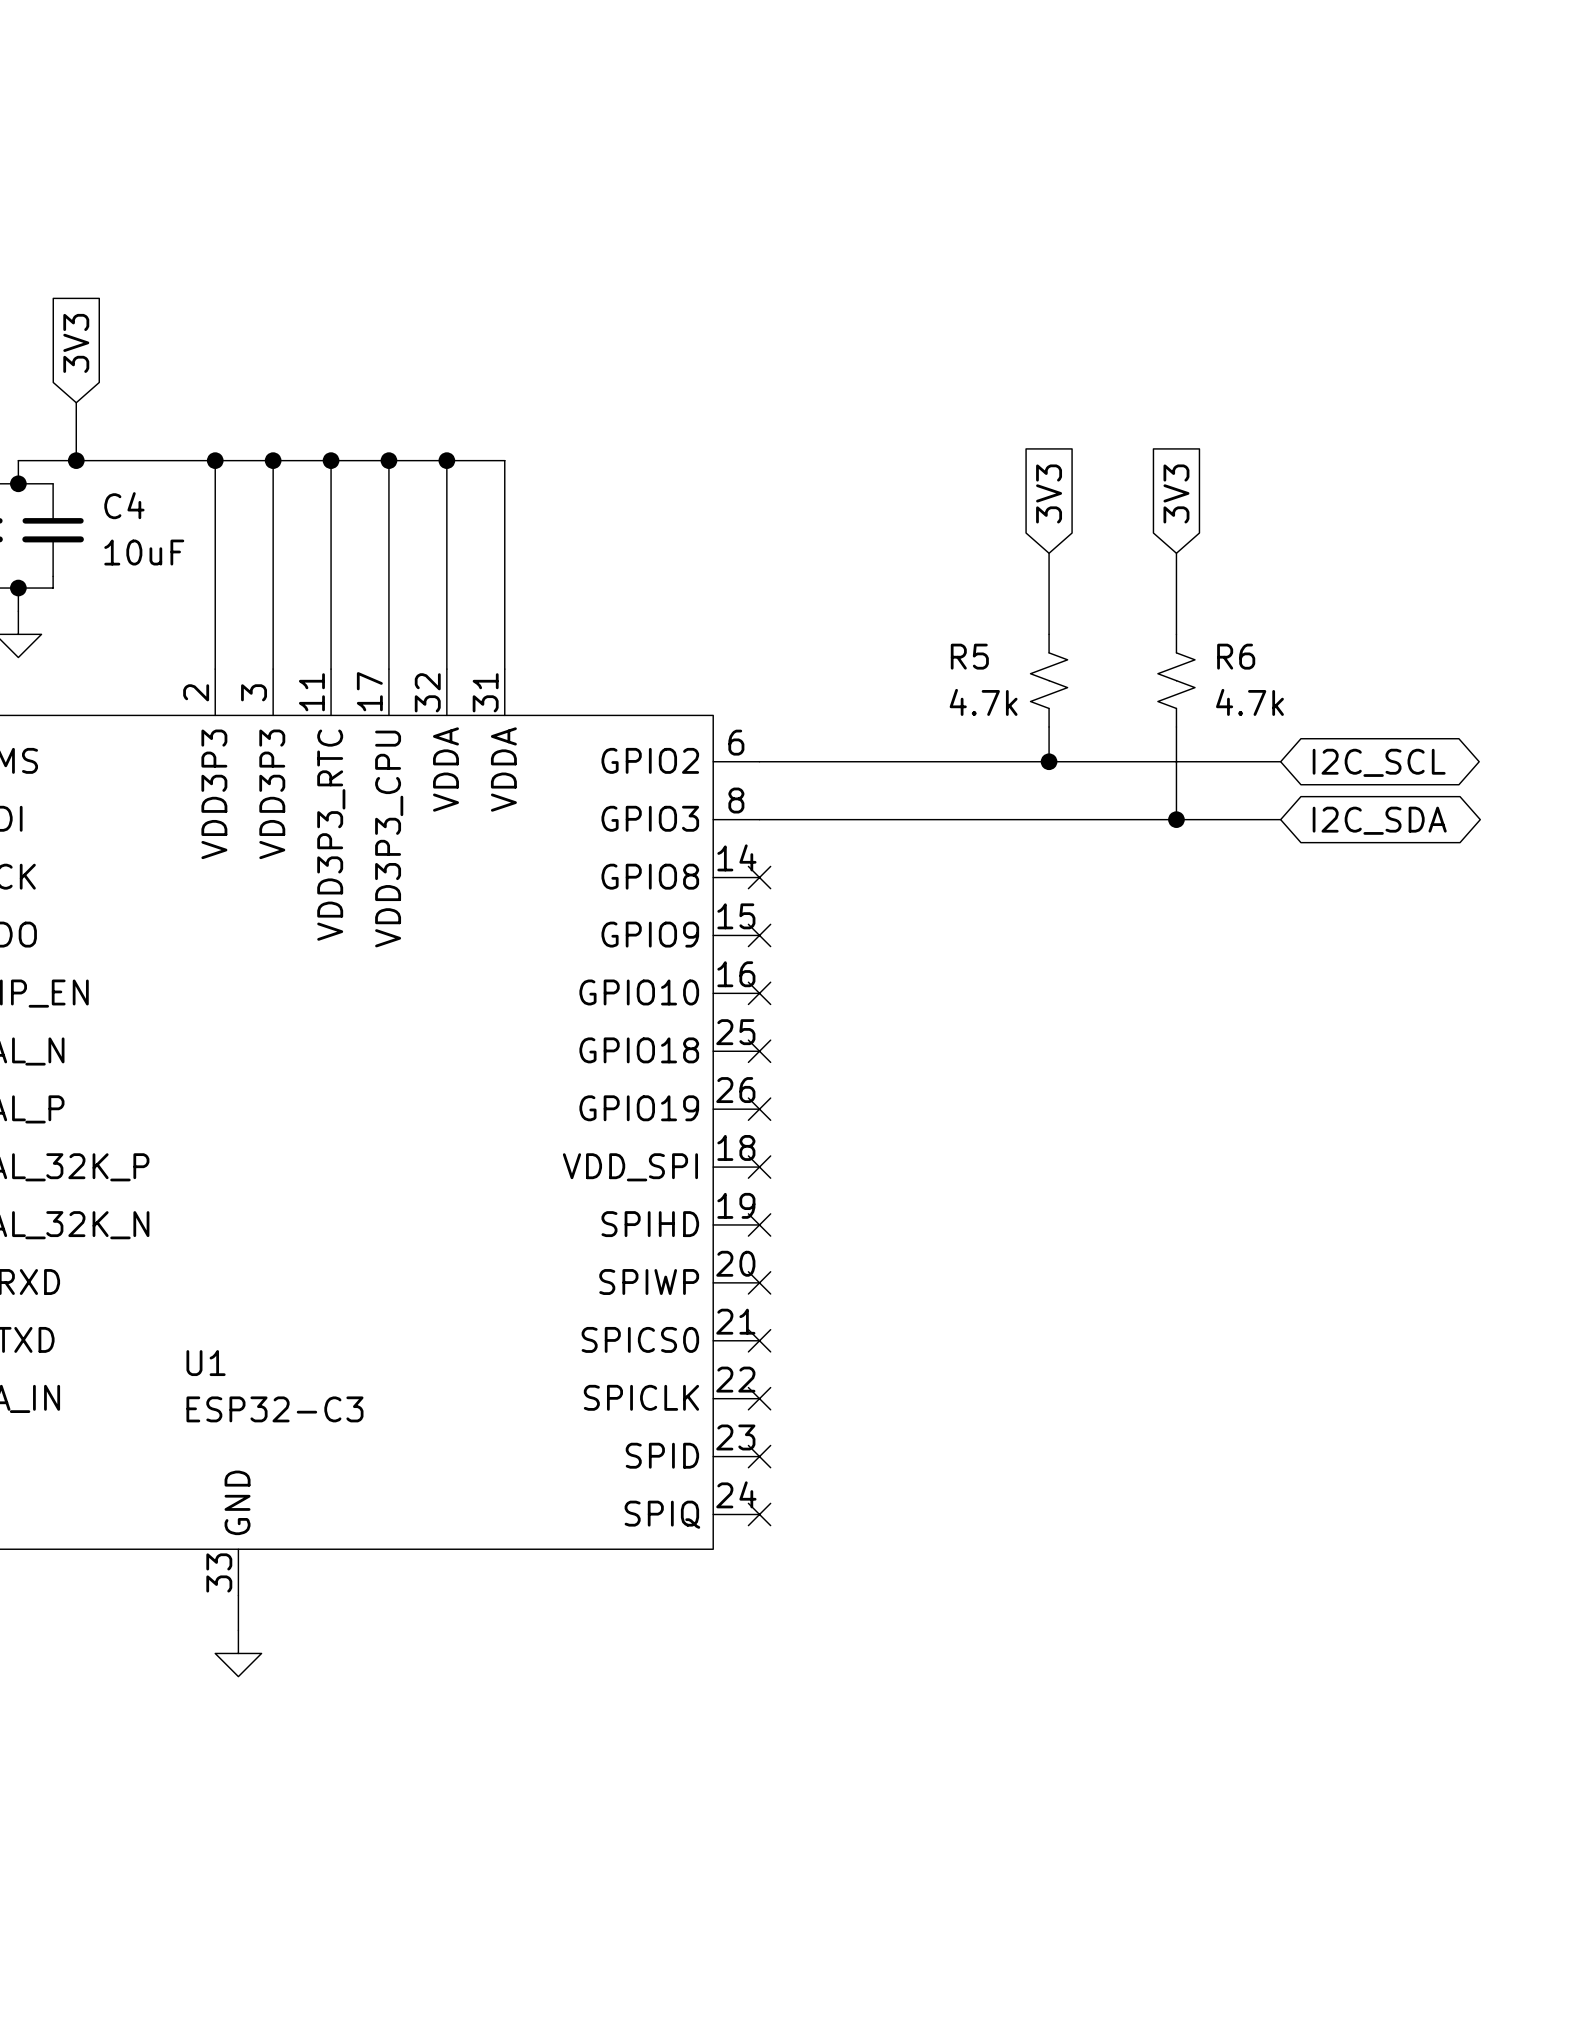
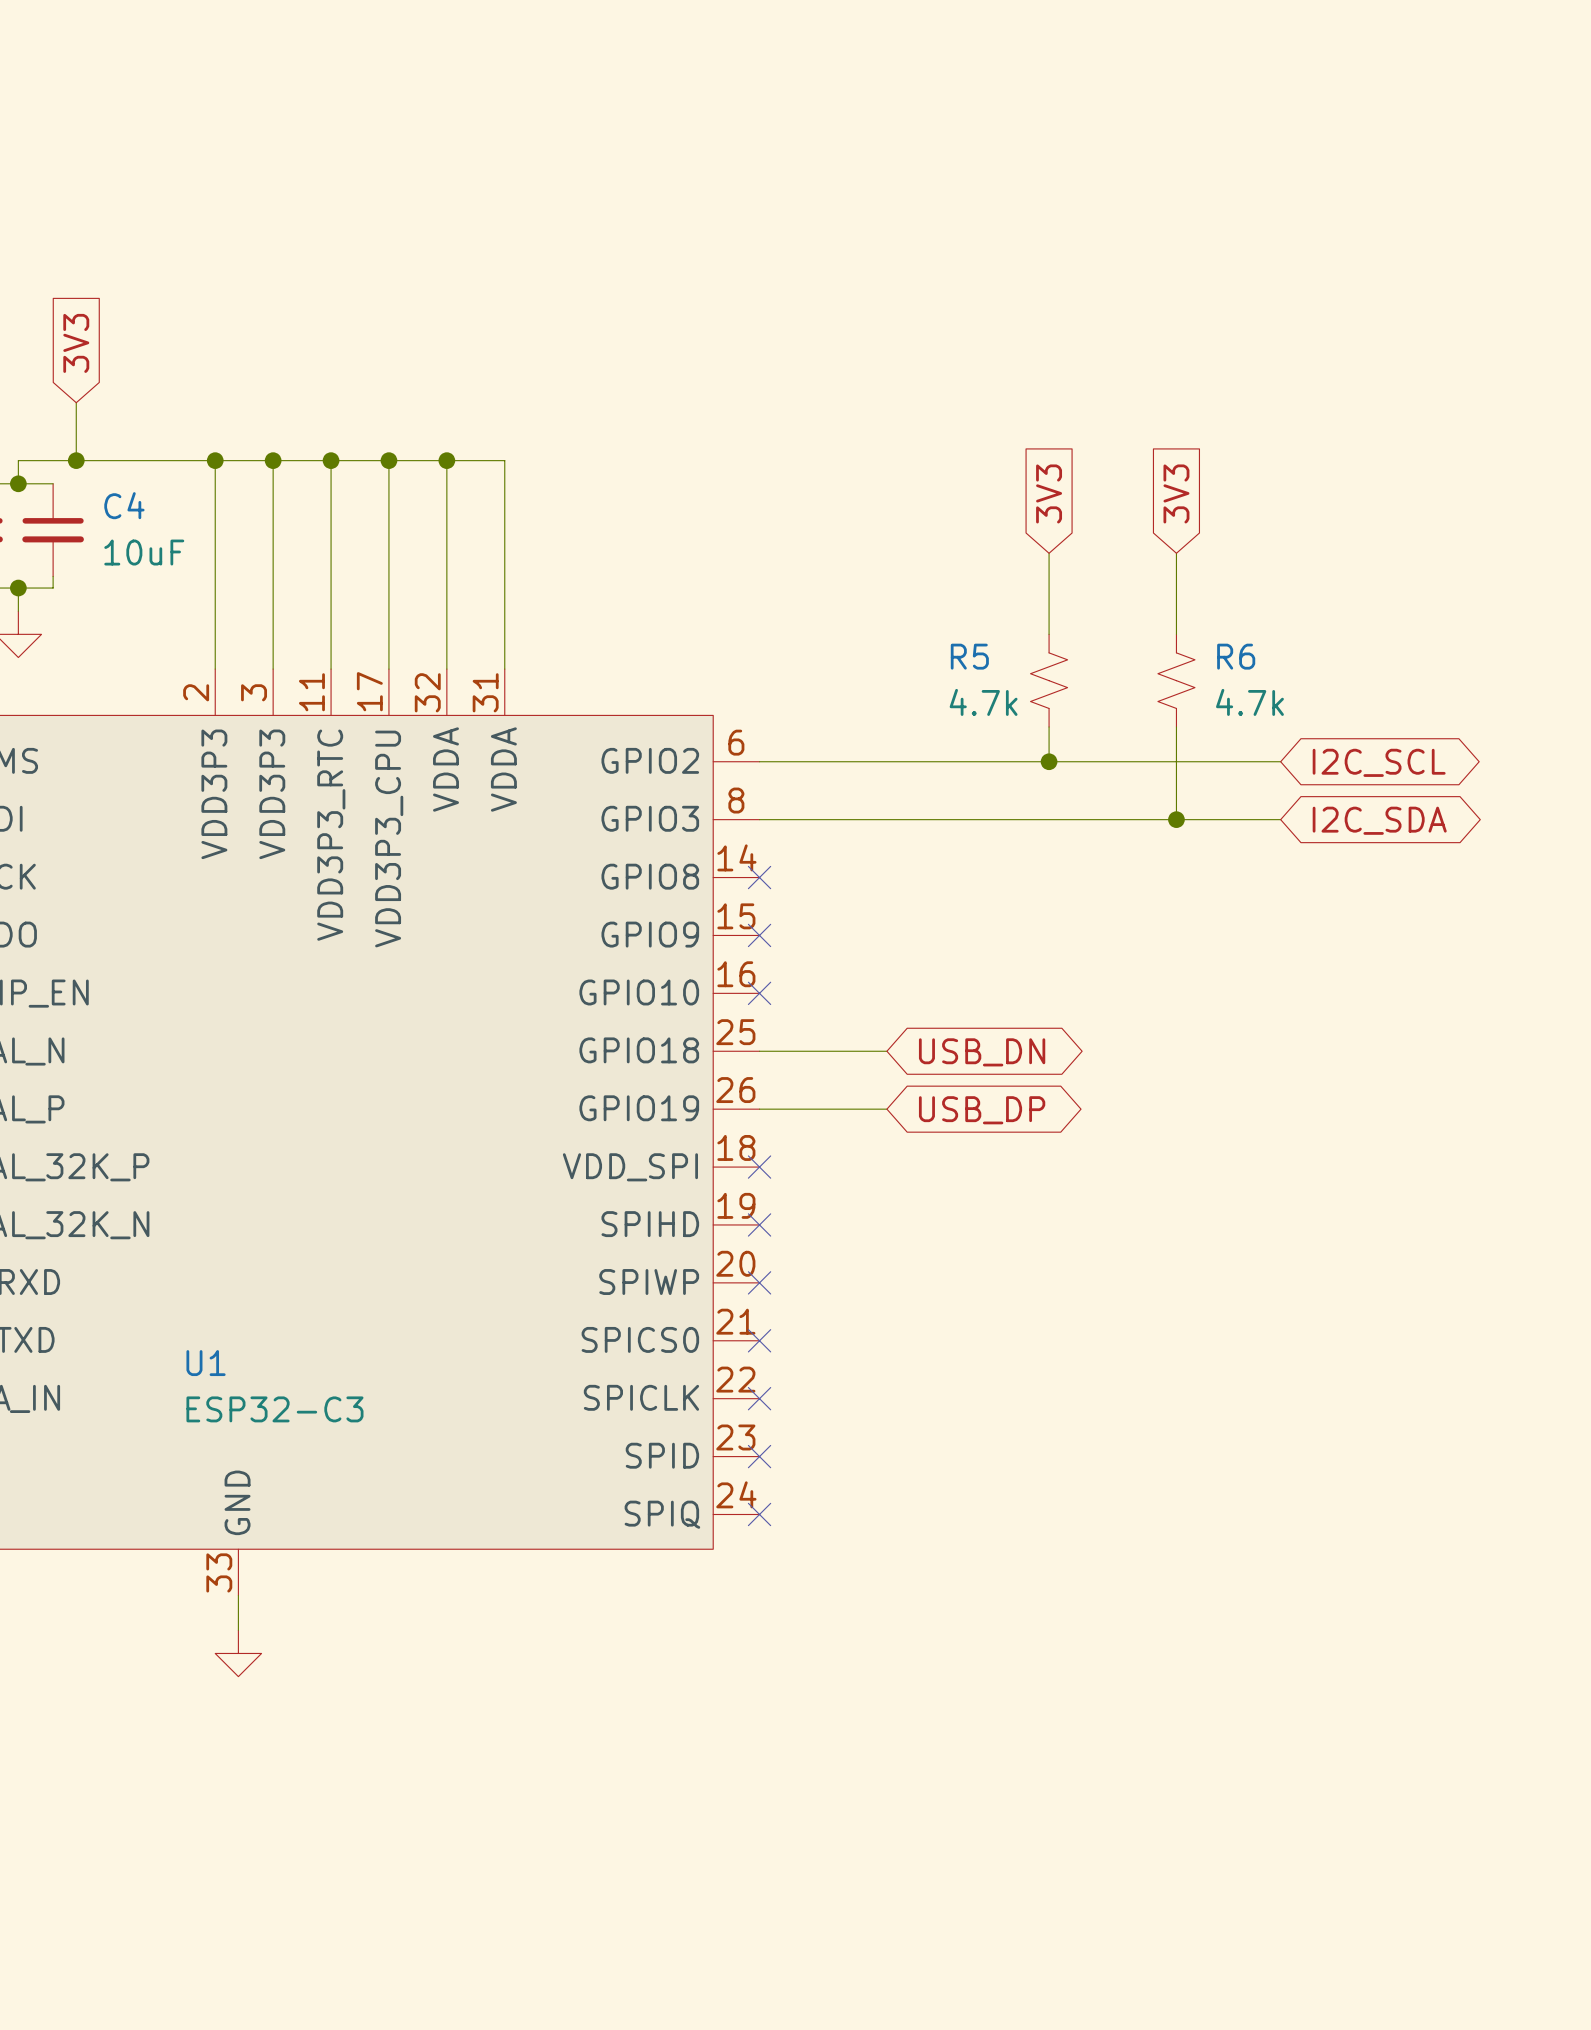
wire: none -> (759, 1051) (886, 1051)
no-connect mark: (759, 1051) -> none
global label: none -> USB_DN (982, 1052)
wire: none -> (759, 1109) (886, 1109)
no-connect mark: (759, 1109) -> none
global label: none -> USB_DP (982, 1110)

